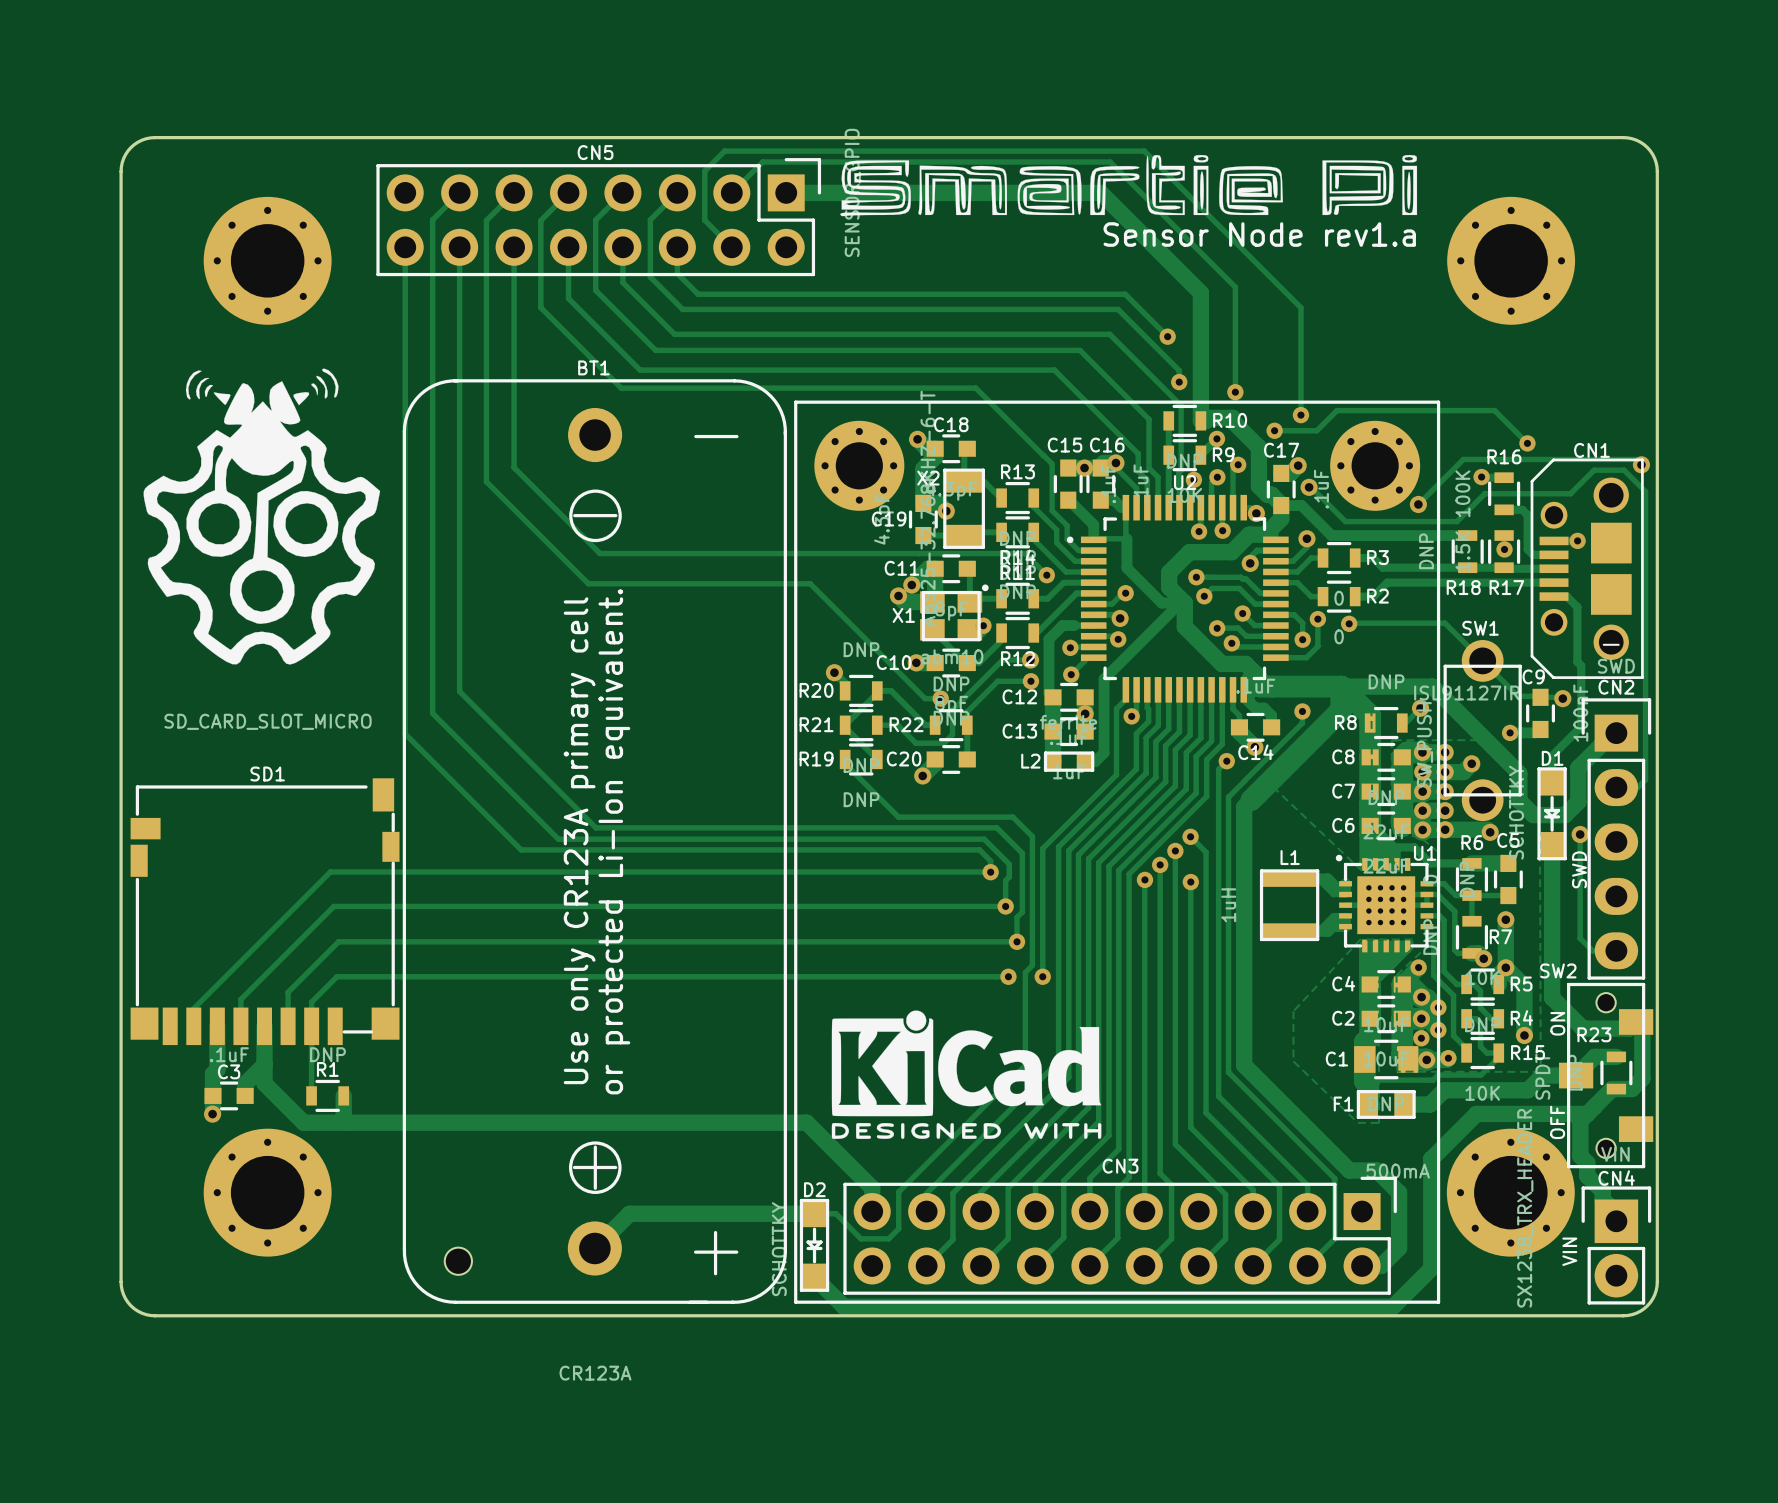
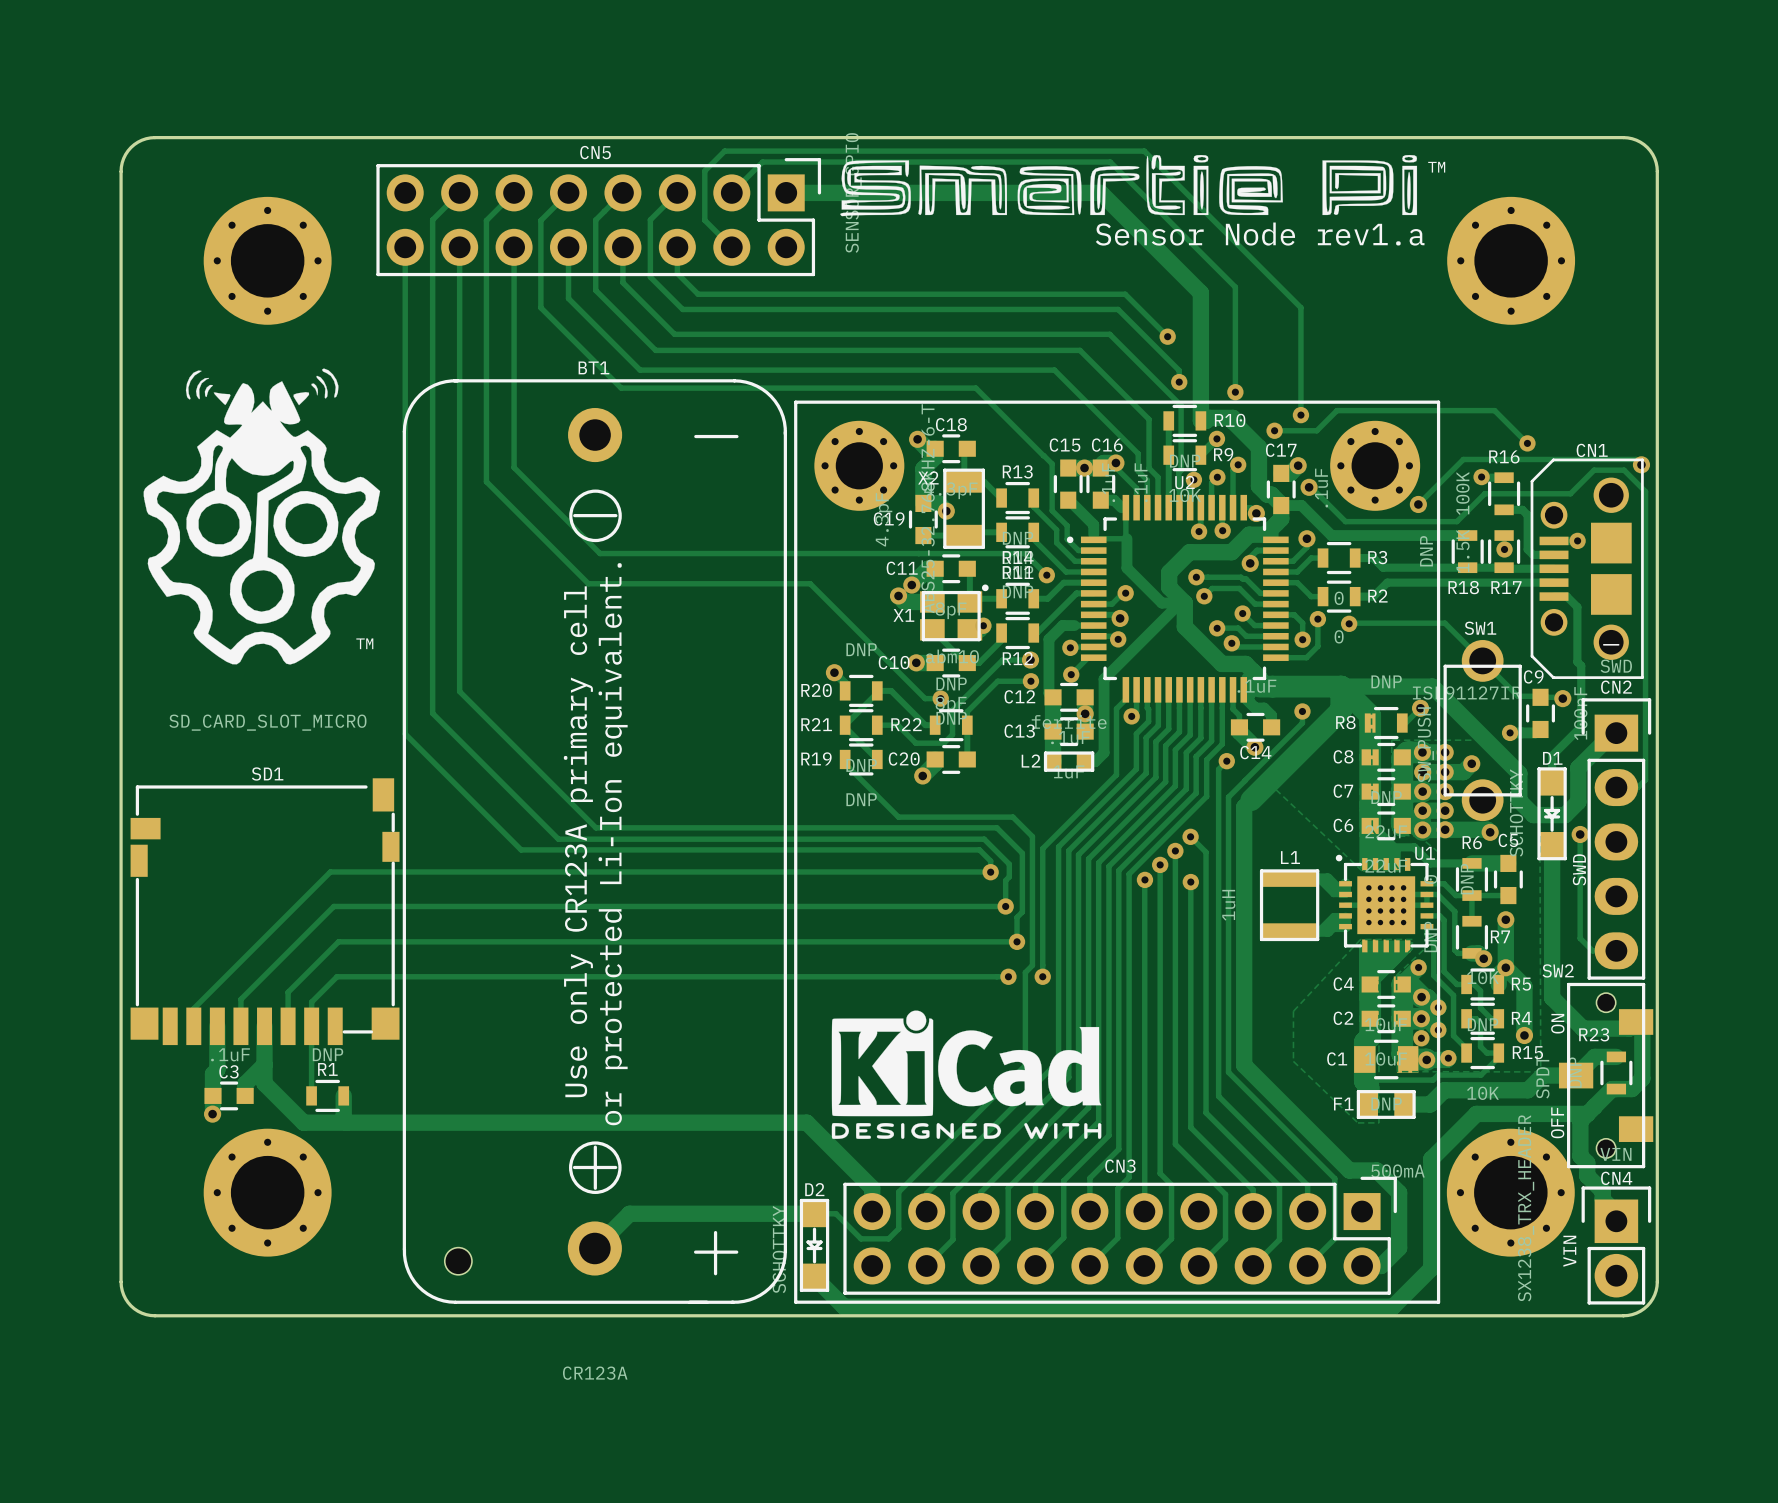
text: none -> TM (1436, 167)
text: none -> TM (364, 643)

